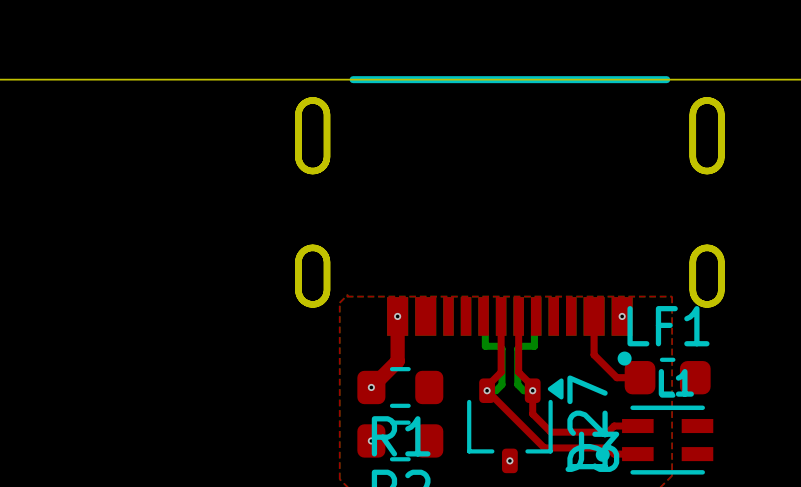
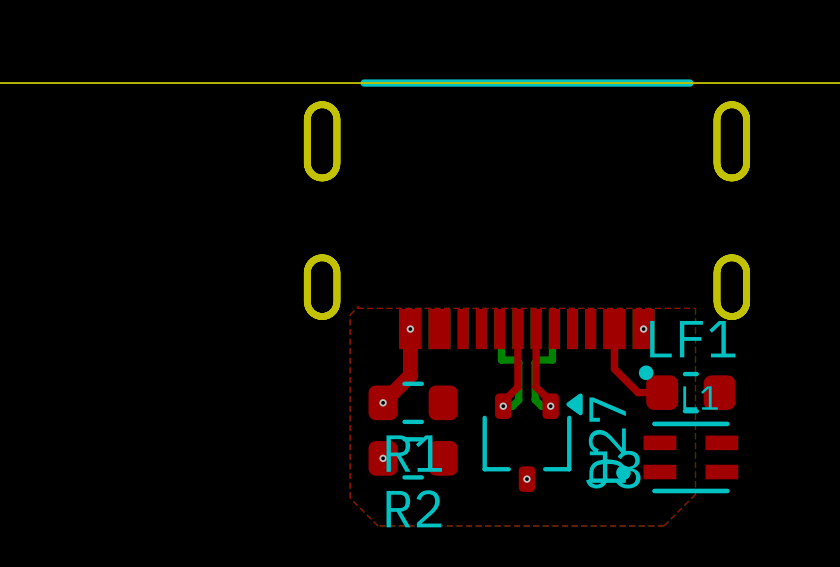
top track: (487, 390) (544, 447) (608, 447) (614, 454) (637, 454) -> none
top track: (532, 390) (532, 414) (550, 432) (608, 432) (614, 426) (637, 426) -> none

